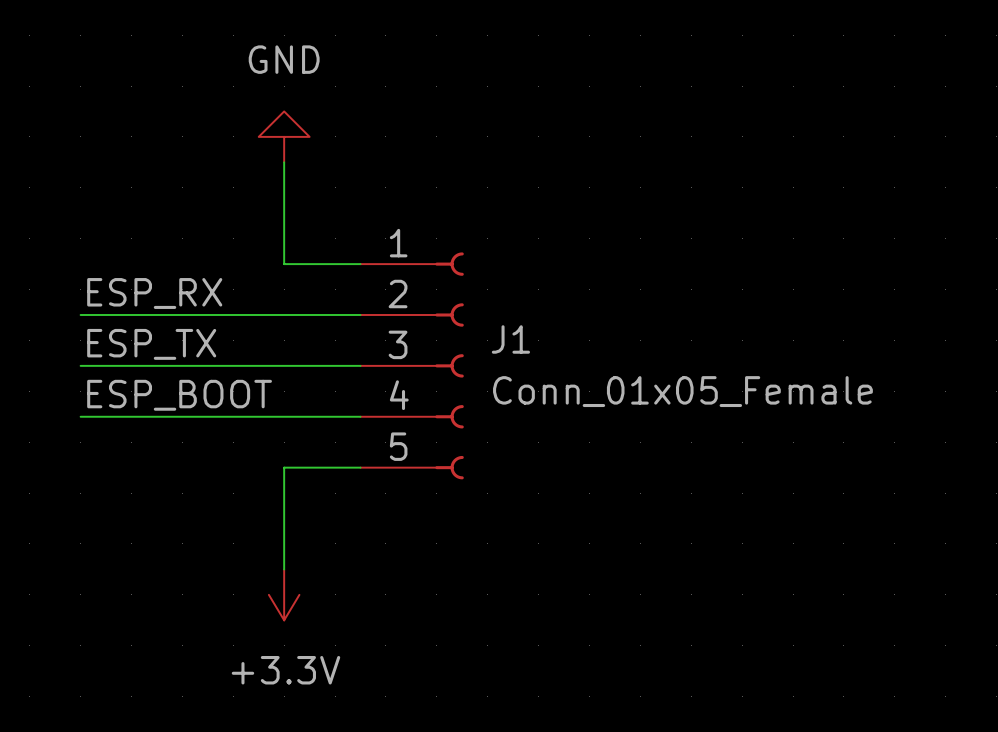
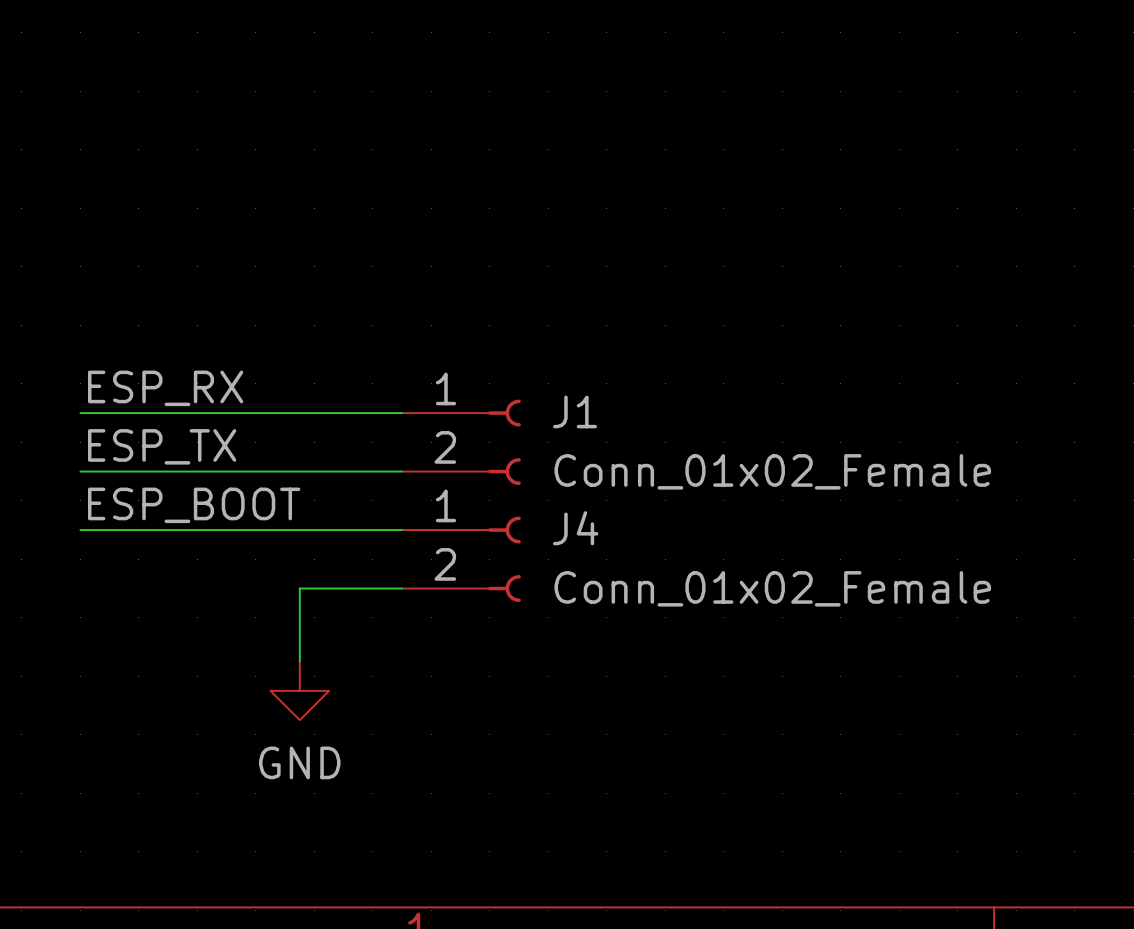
power symbol rotation: 0° (284, 136) -> 180° (299, 690)
power symbol position: GND (284, 136) -> GND (299, 690)
wire: (284, 162) (284, 264) (360, 264) -> none
J1 symbol: [360, 252, 464, 480] -> [402, 399, 521, 486]
J1 value: Conn_01x05_Female (682, 391) -> Conn_01x02_Female (772, 471)
J4: none -> Conn_01x02_Female (461, 559)
wire: (284, 467) (284, 569) -> (314, 588) (299, 588) (299, 661)
power symbol: +3.3V (284, 594) -> none

